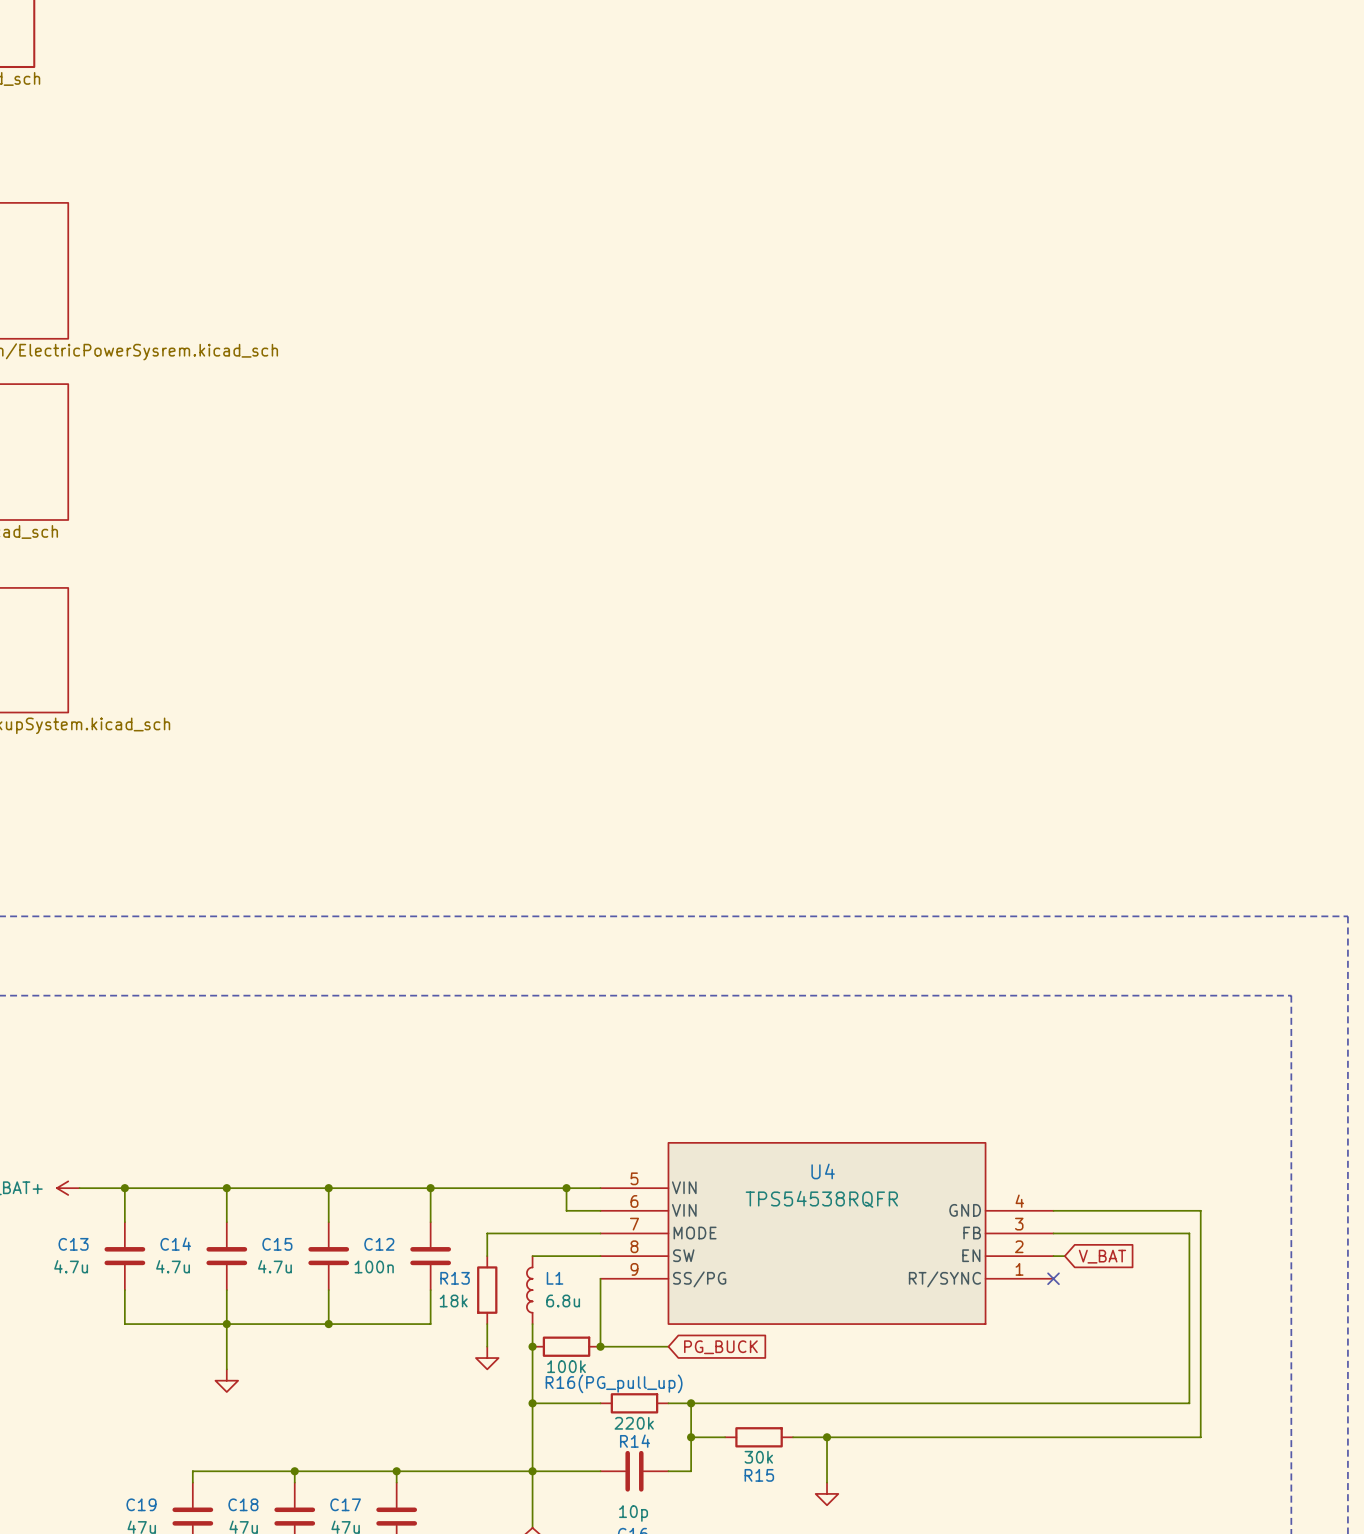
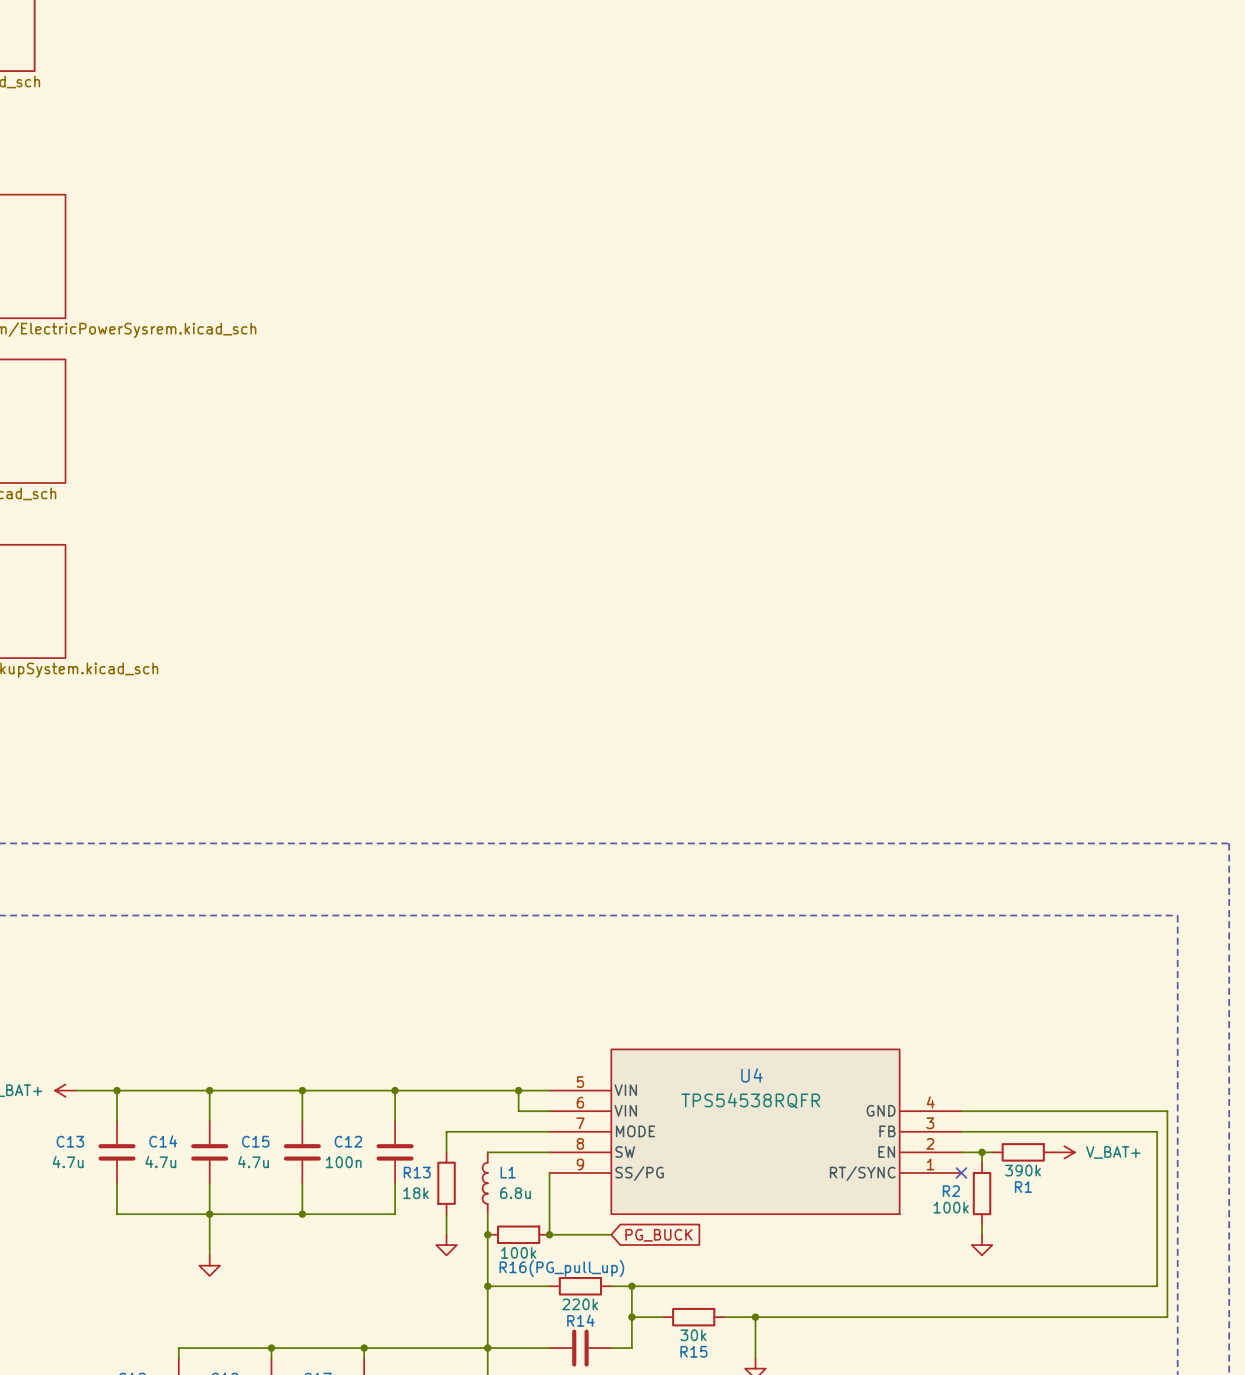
wire: (1200, 1210) (1200, 1437) -> (1095, 1111) (1167, 1111) (1167, 1317) (1095, 1317)
wire: (1189, 1233) (1189, 1403) -> (1085, 1131) (1157, 1131) (1157, 1286) (1085, 1286)
wire: none -> (971, 1152) (992, 1152)
wire: none -> (982, 1152) (982, 1162)
junction: none -> (982, 1152)
global label: V_BAT (1102, 1256) -> none
R1: none -> 390k (1023, 1152)
power symbol: none -> V_BAT+ (1064, 1152)
R2: none -> 100k (982, 1193)
wire: none -> (982, 1224) (982, 1234)
power symbol: none -> (982, 1245)

